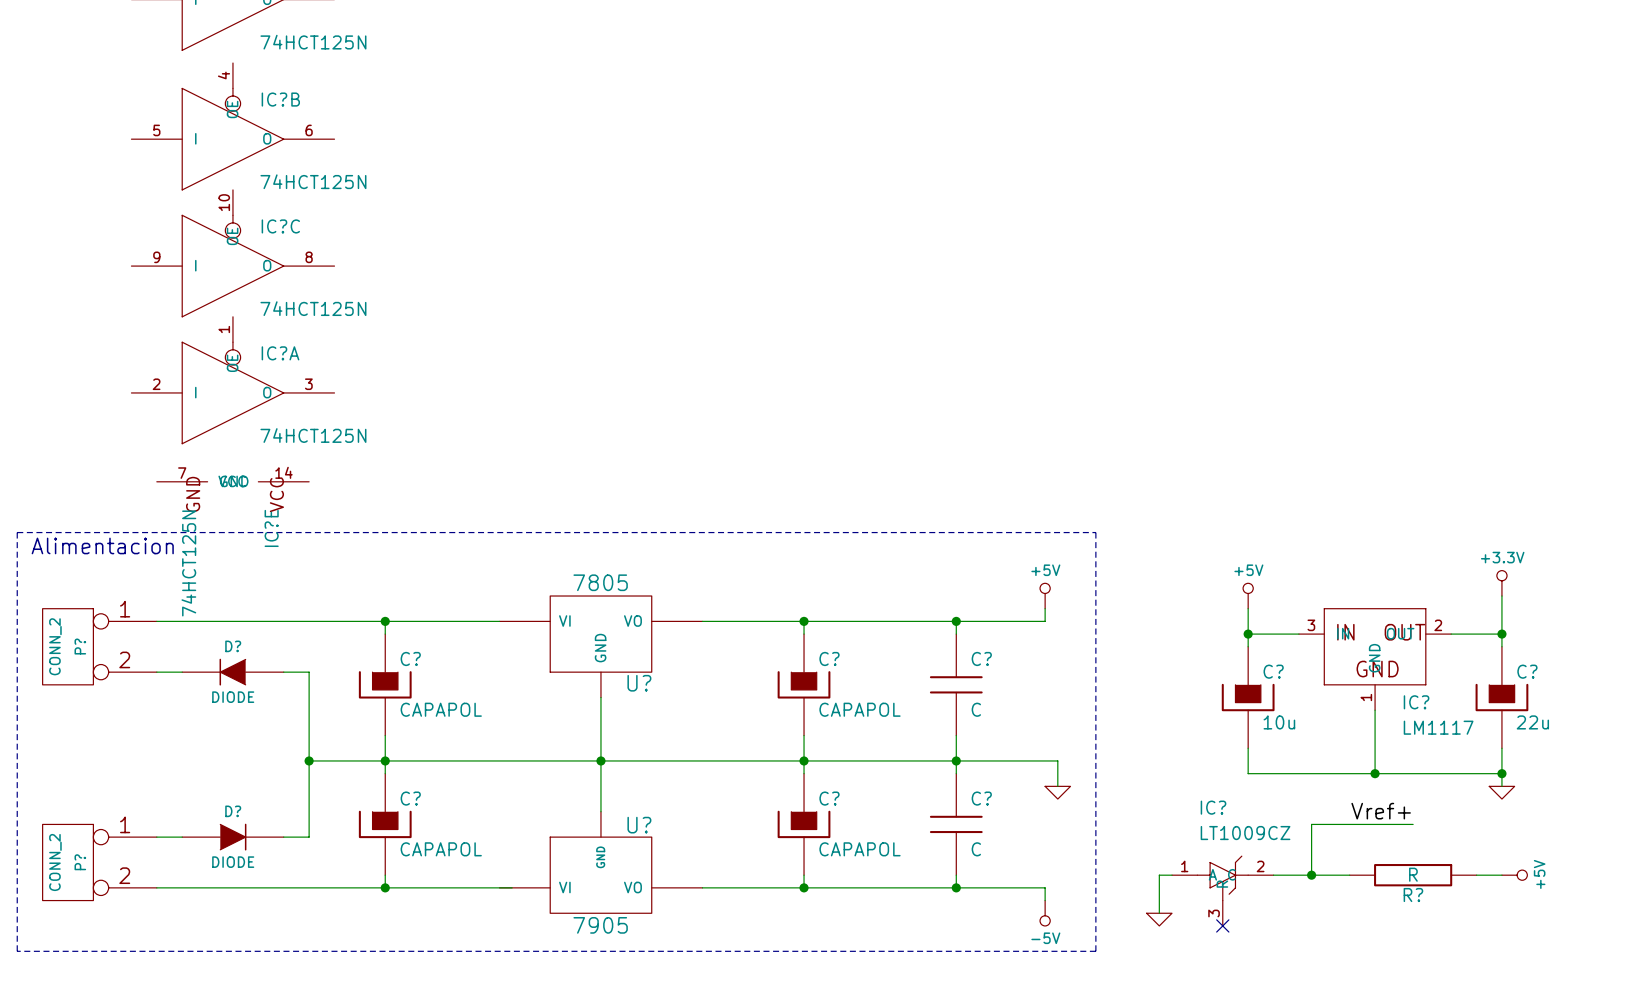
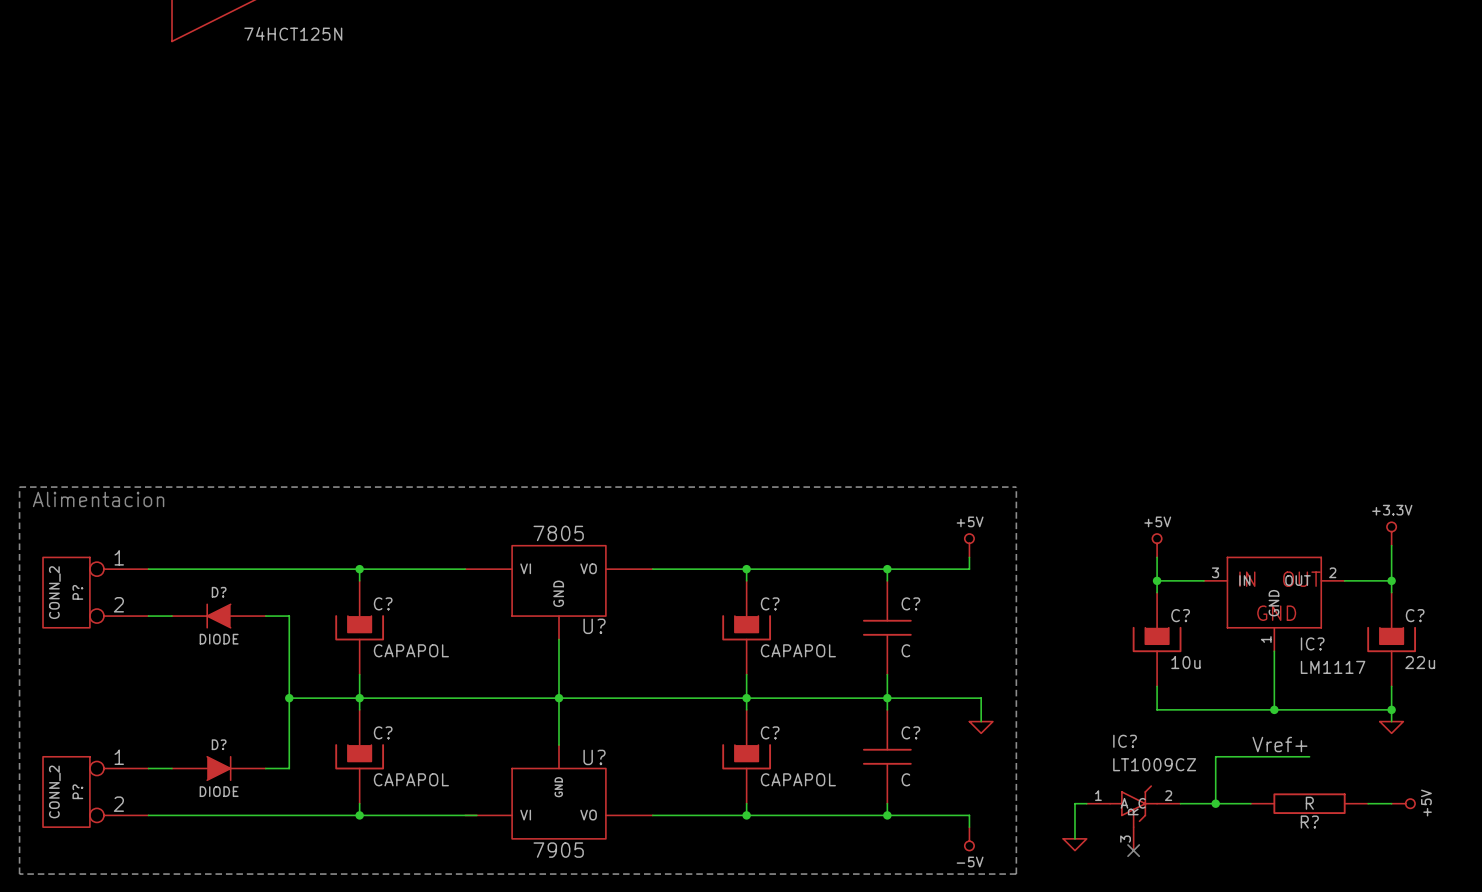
IC?B: 74HCT125N (232, 126) -> none
IC?C: 74HCT125N (232, 253) -> none
IC?A: 74HCT125N (232, 380) -> none
IC?E: 74HCT125N (232, 481) -> none

